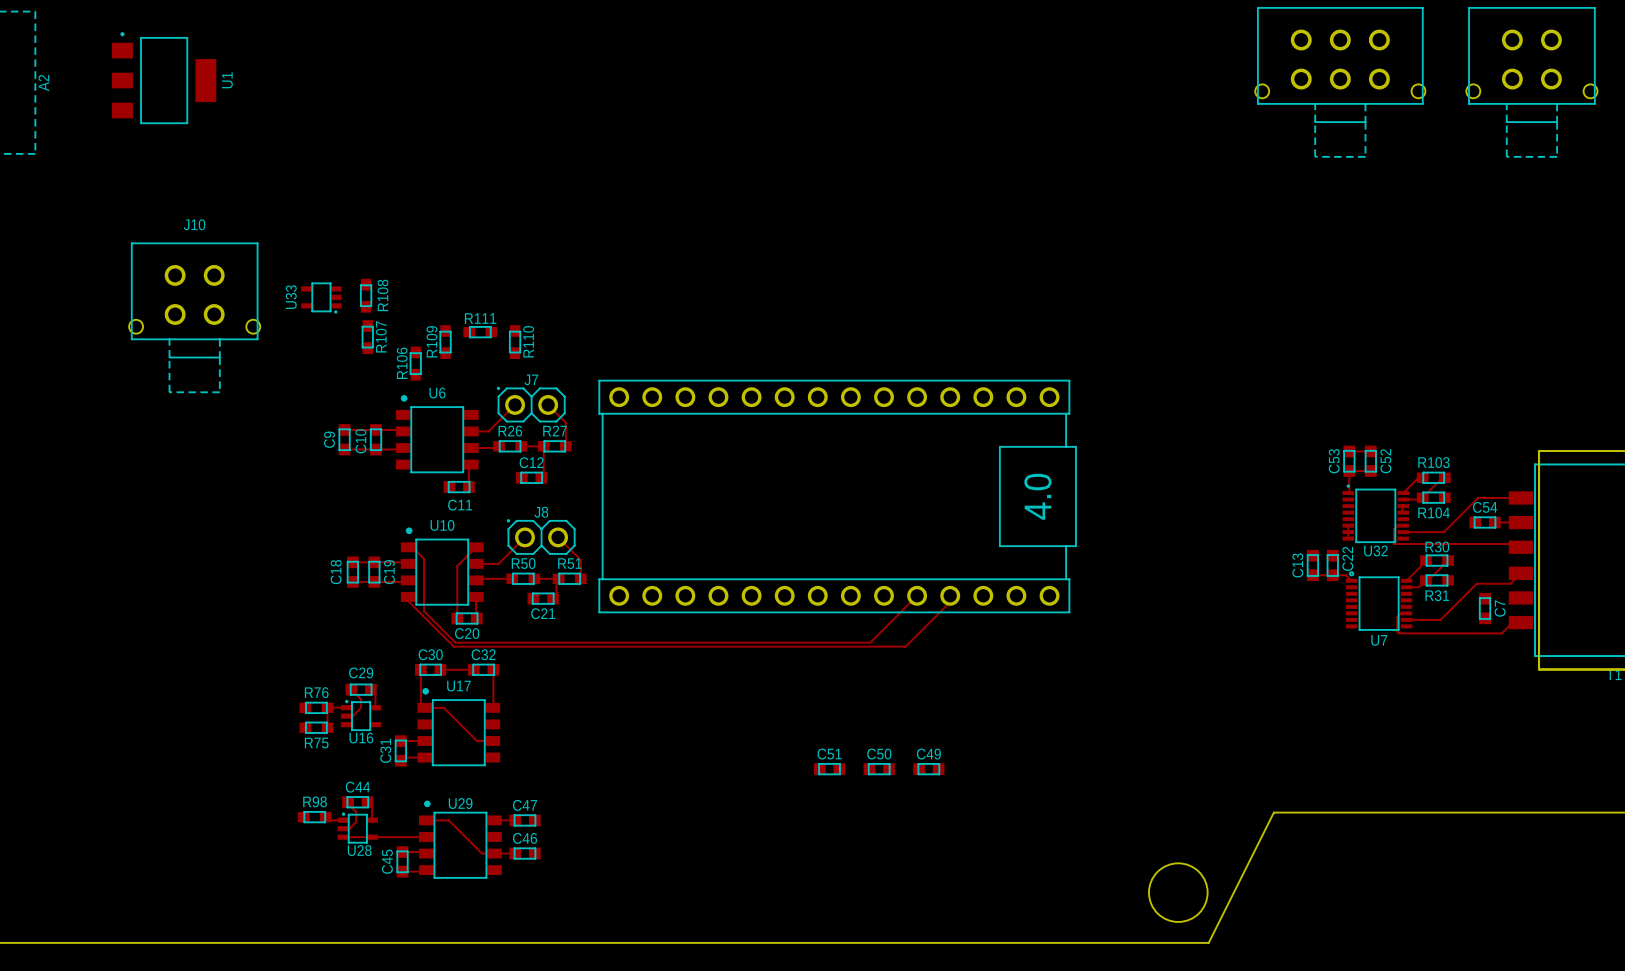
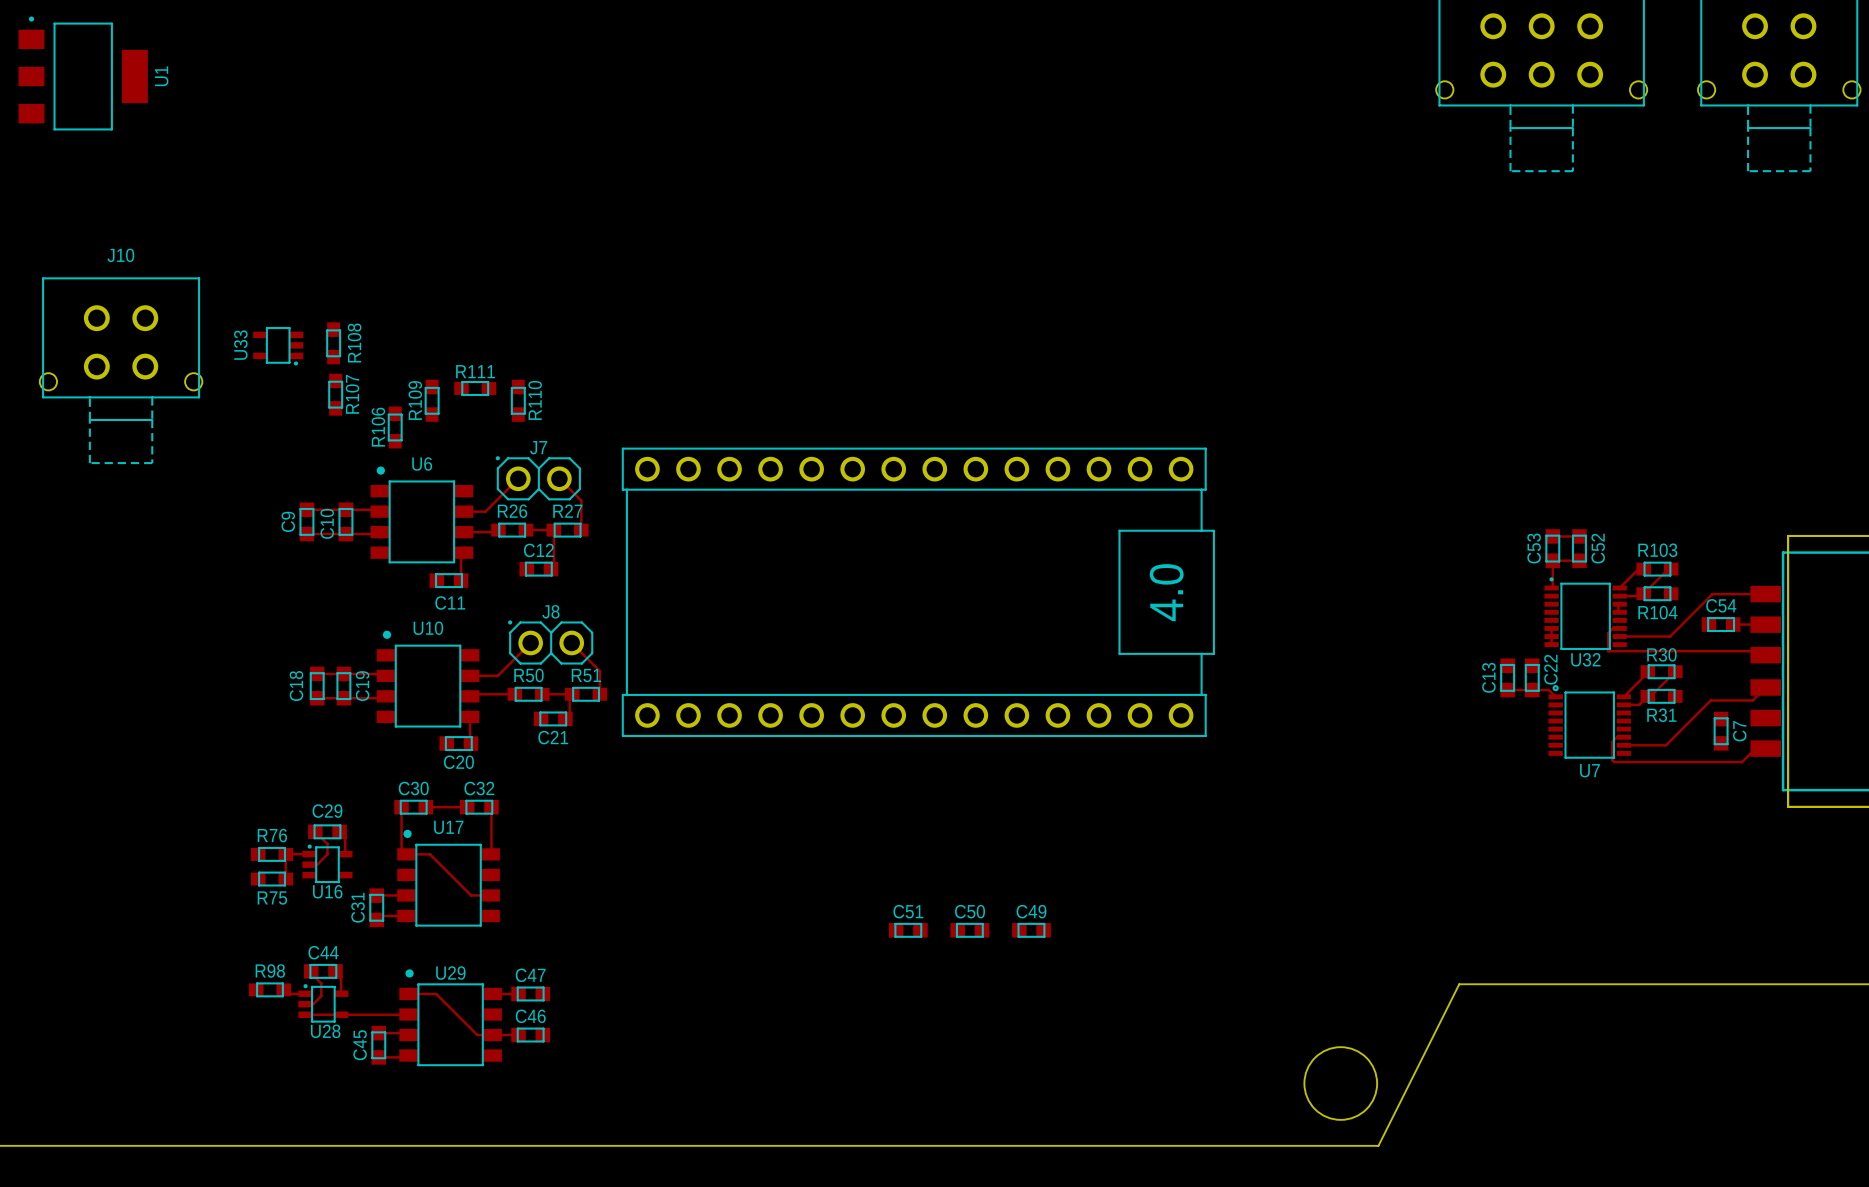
track: (408, 547) (412, 547) (424, 558) (424, 611) (455, 642) (870, 642) (917, 595) -> none
track: (476, 547) (457, 566) (457, 618) -> none
track: (950, 595) (950, 602) (905, 646) (453, 646) (408, 601) (408, 596) -> none

